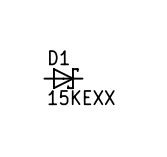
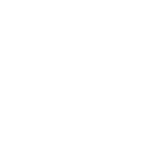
D1: 15KEXX (63, 78) -> none

